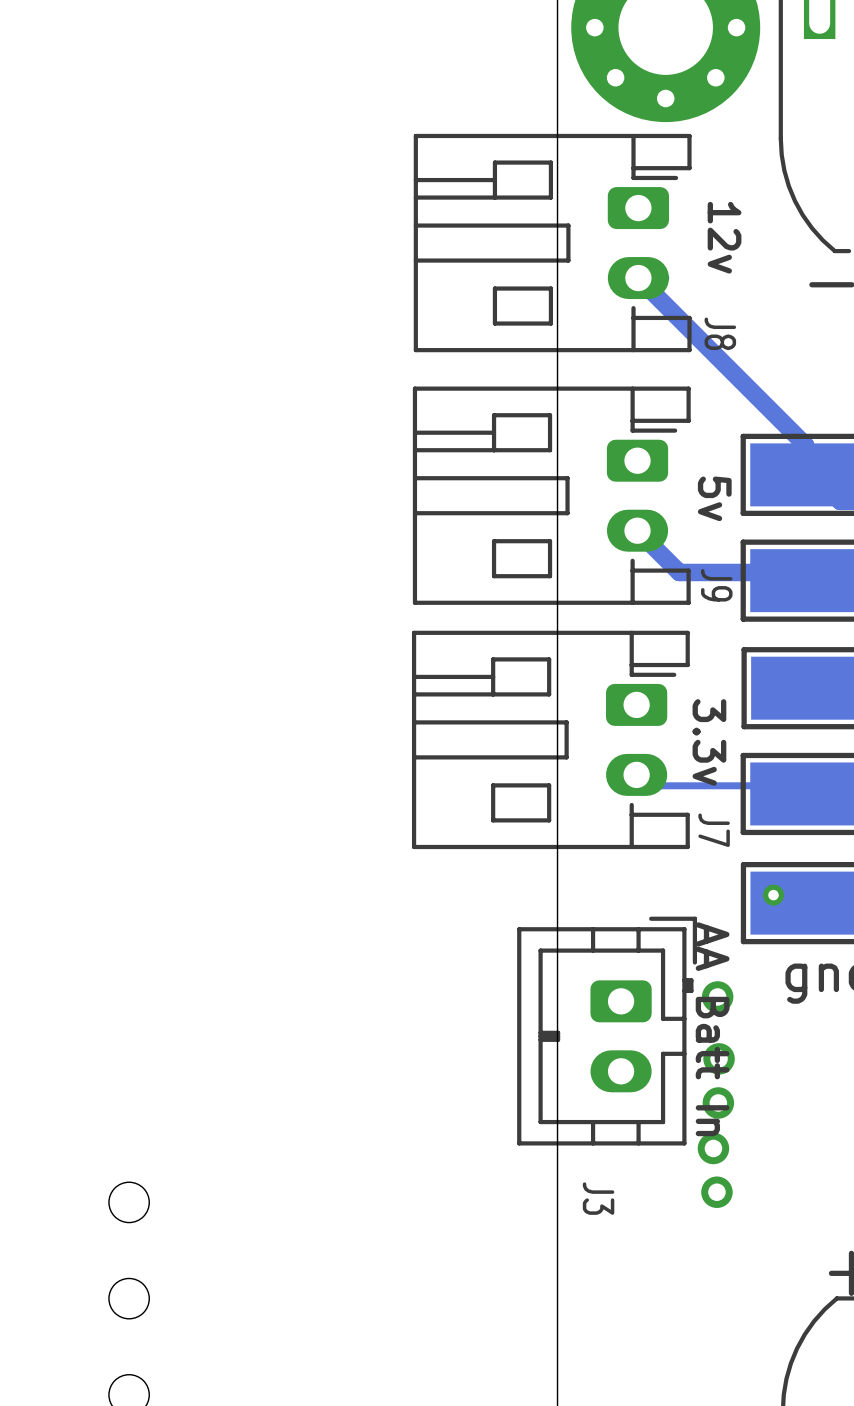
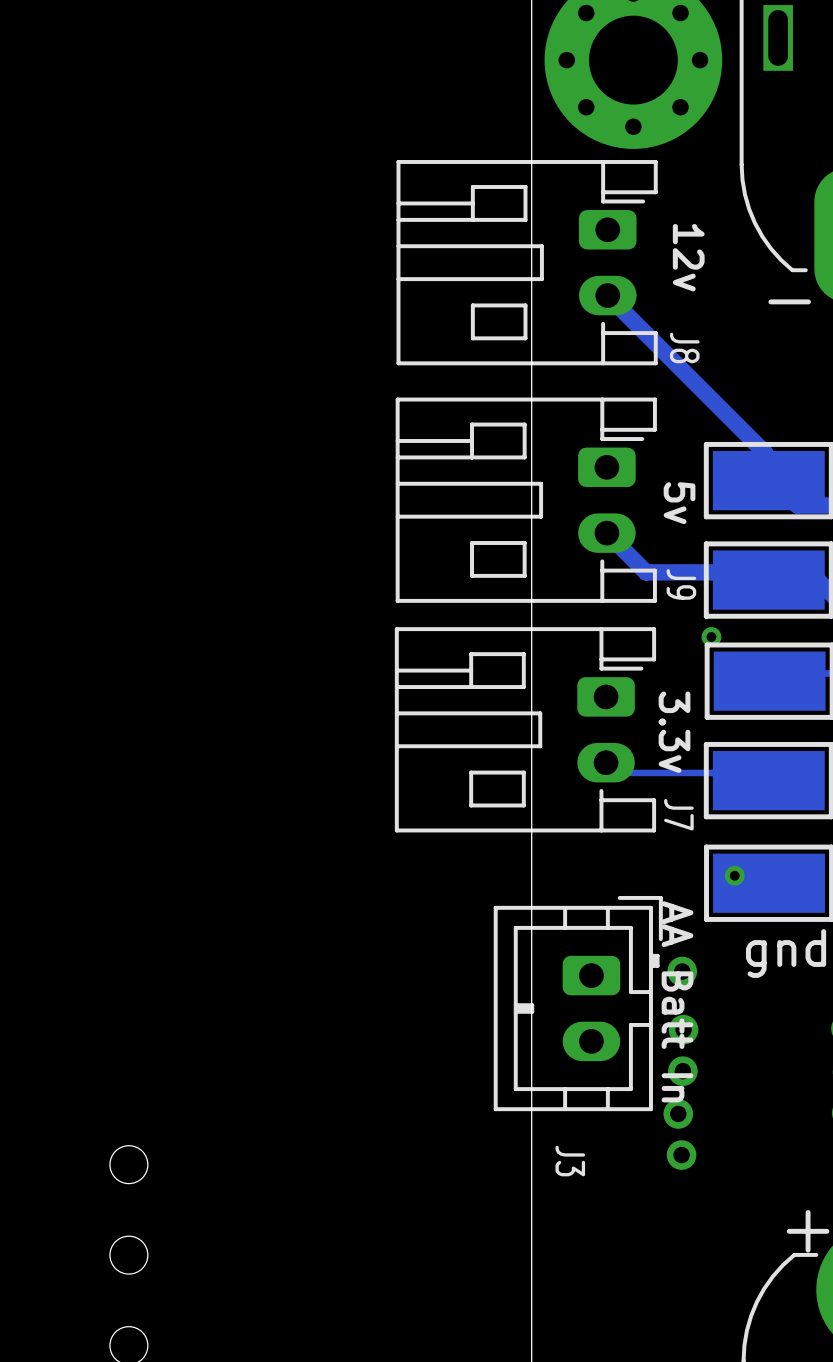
via: none -> (711, 636)

